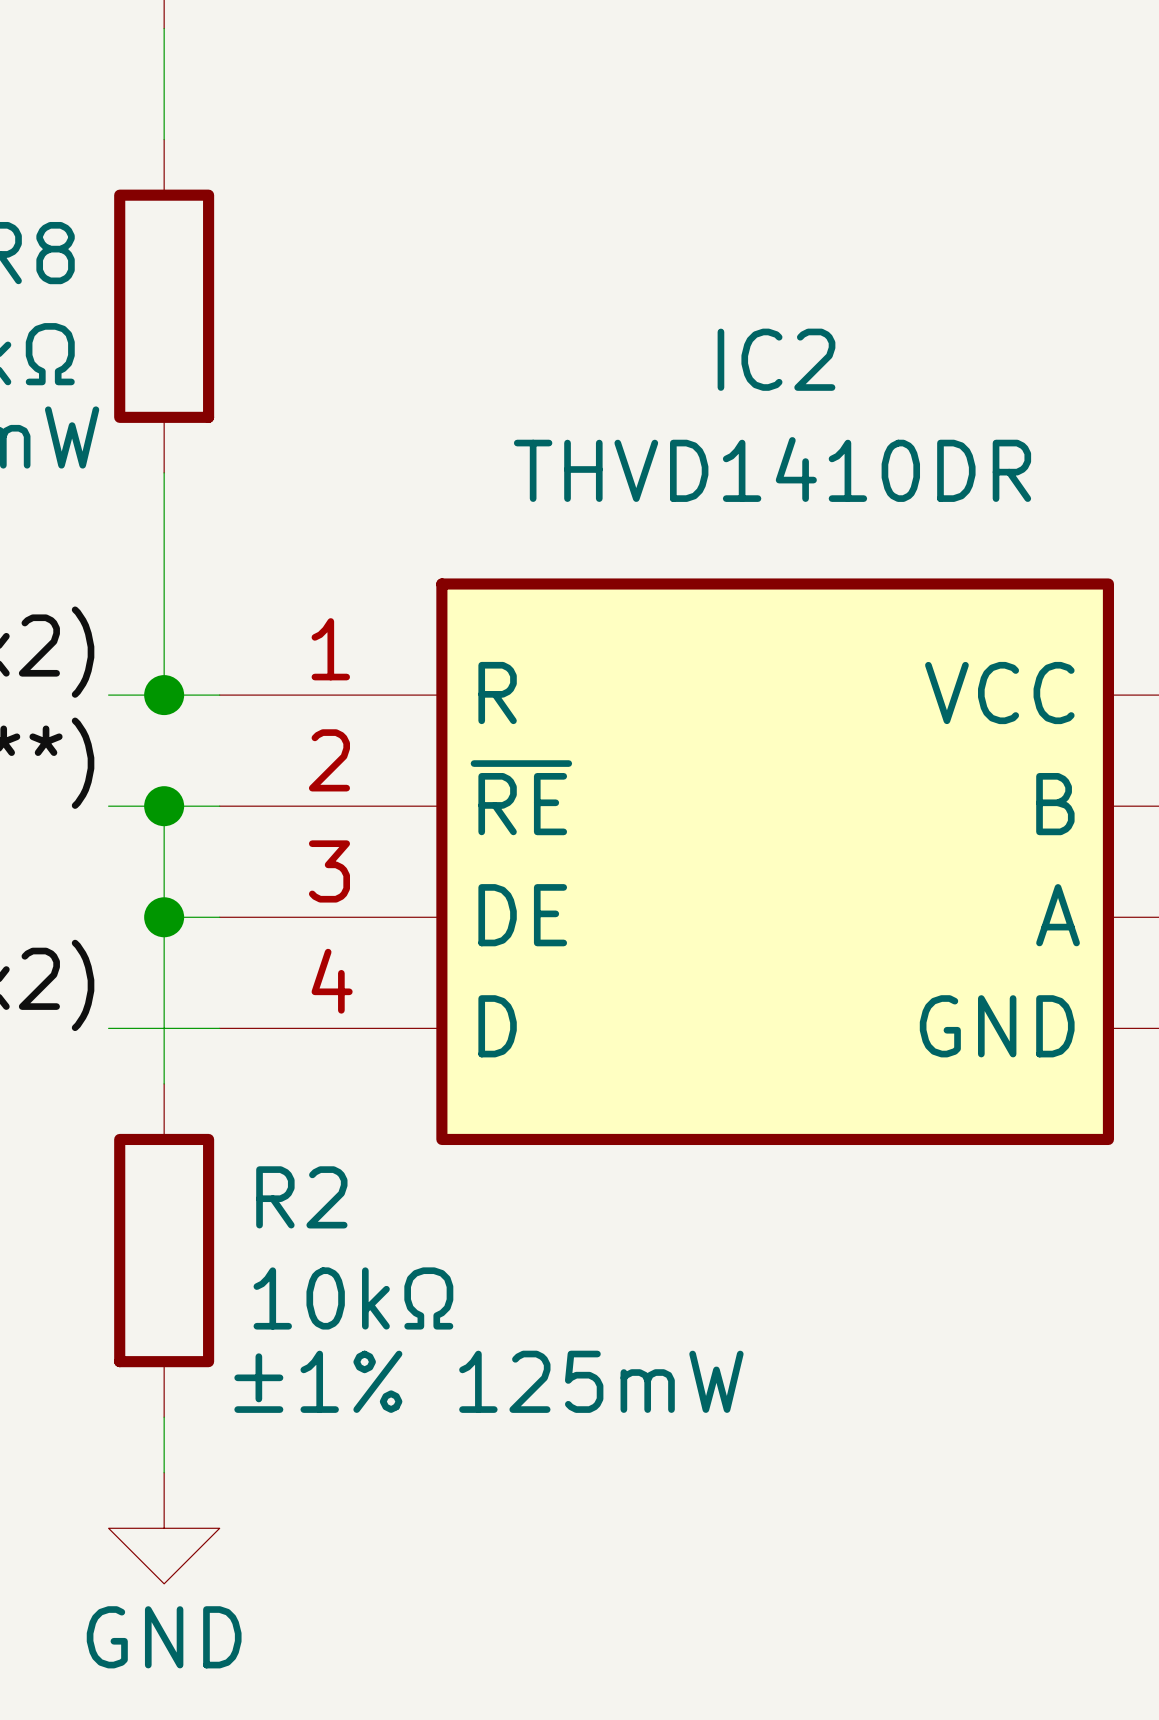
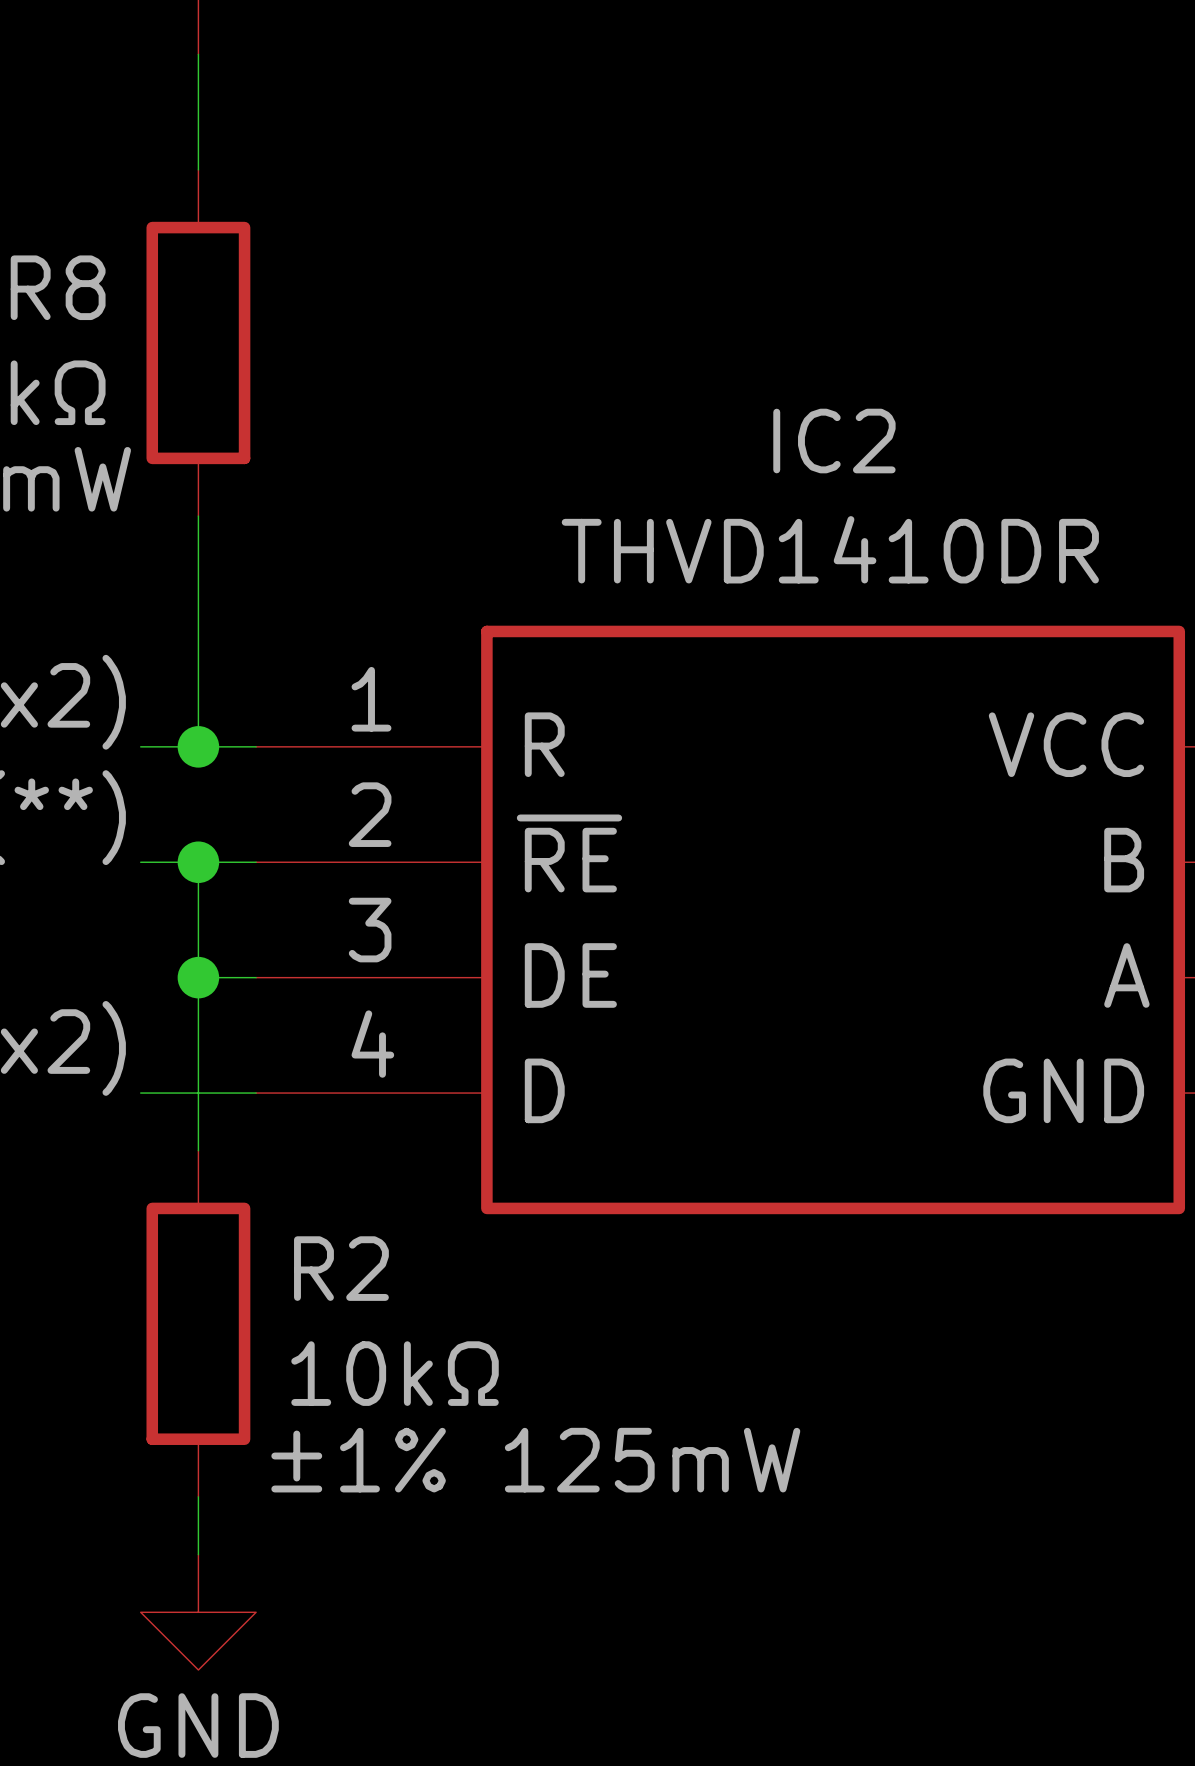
IC2 name position: IC2 (776, 359) -> IC2 (834, 441)
IC2 value position: THVD1410DR (772, 469) -> THVD1410DR (830, 549)

